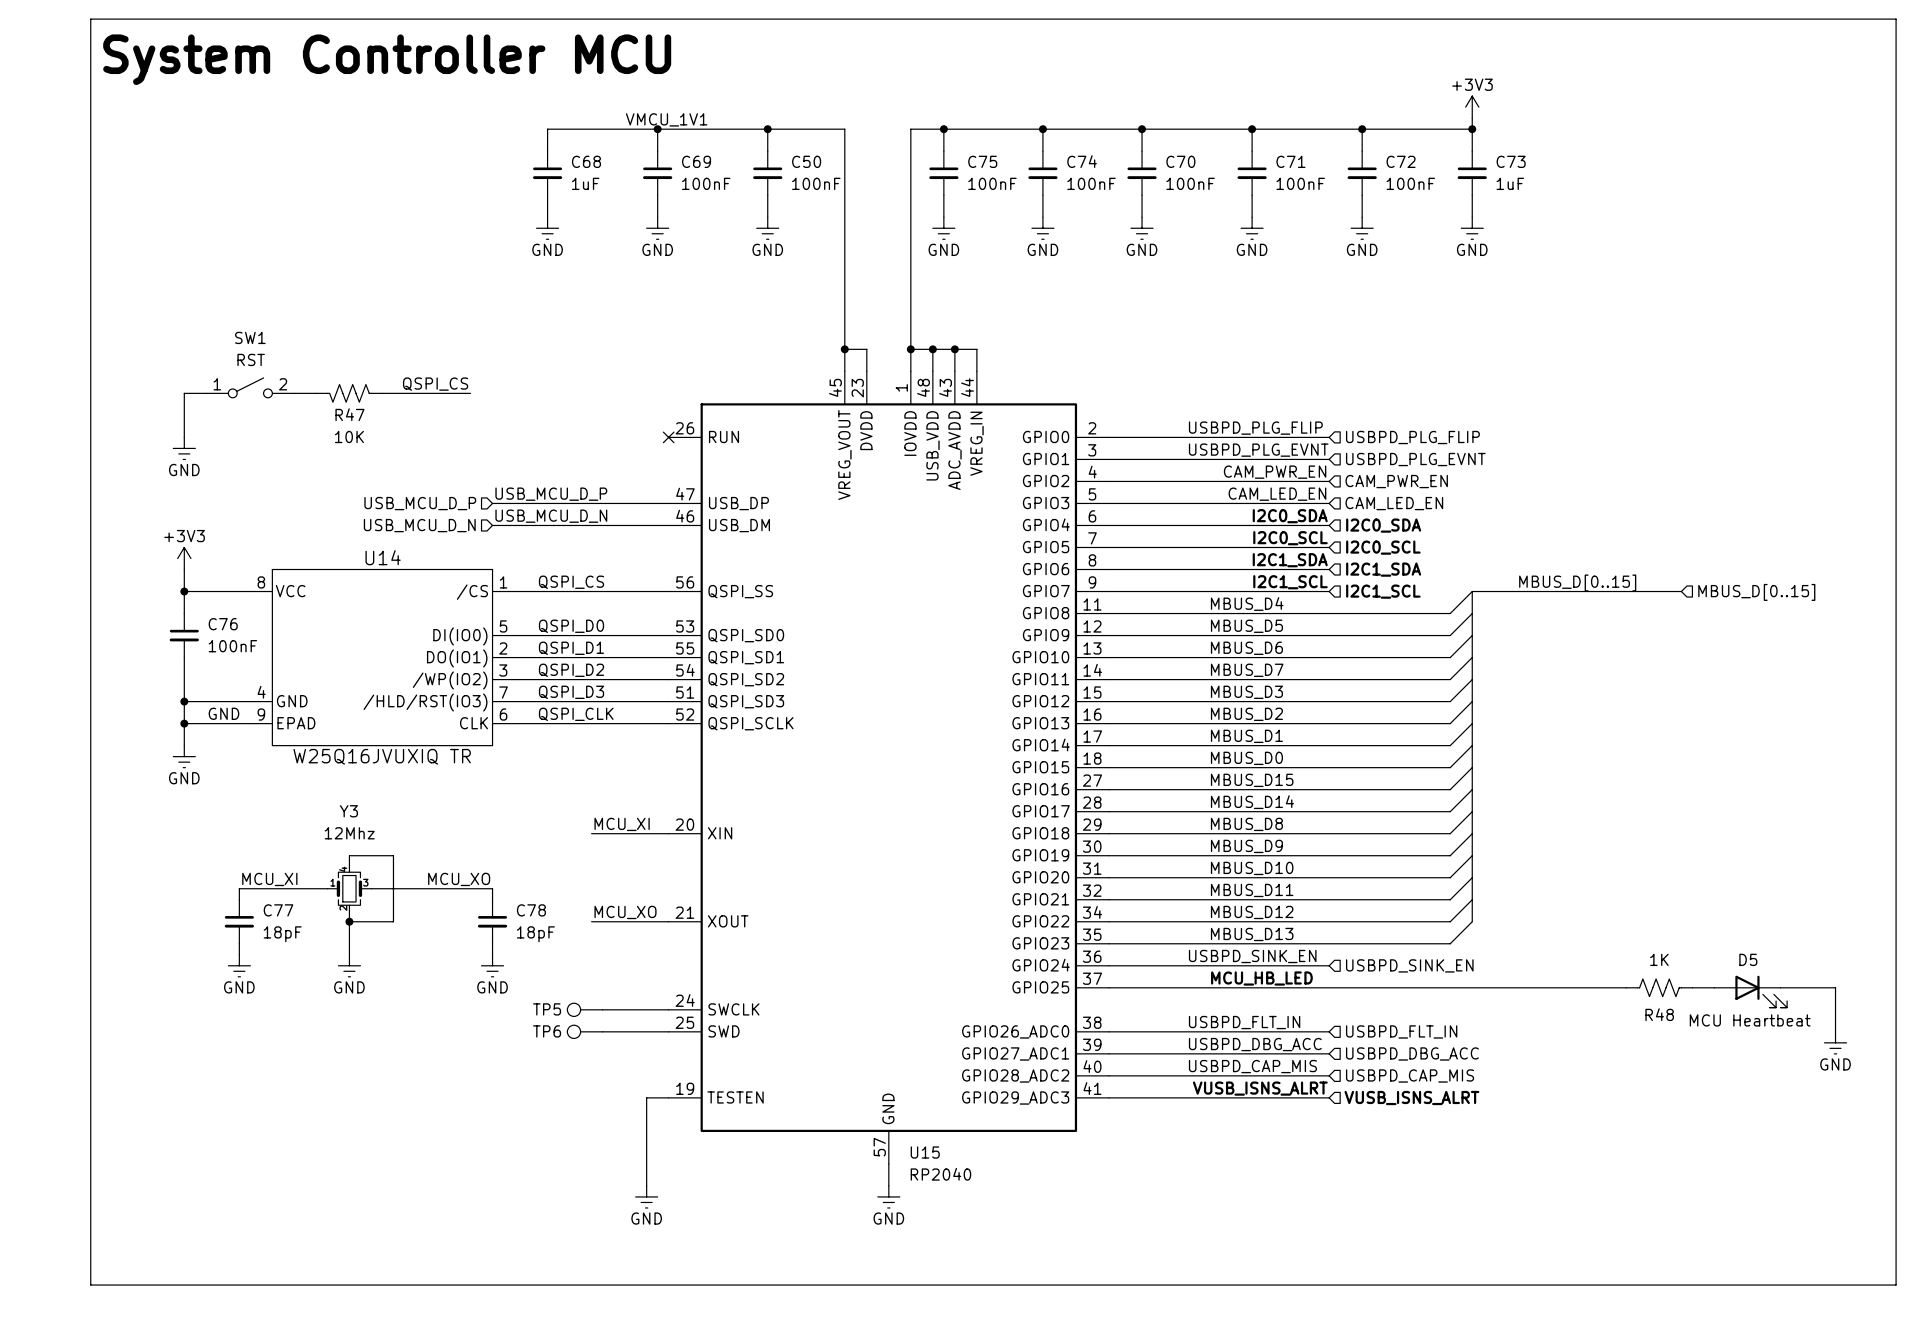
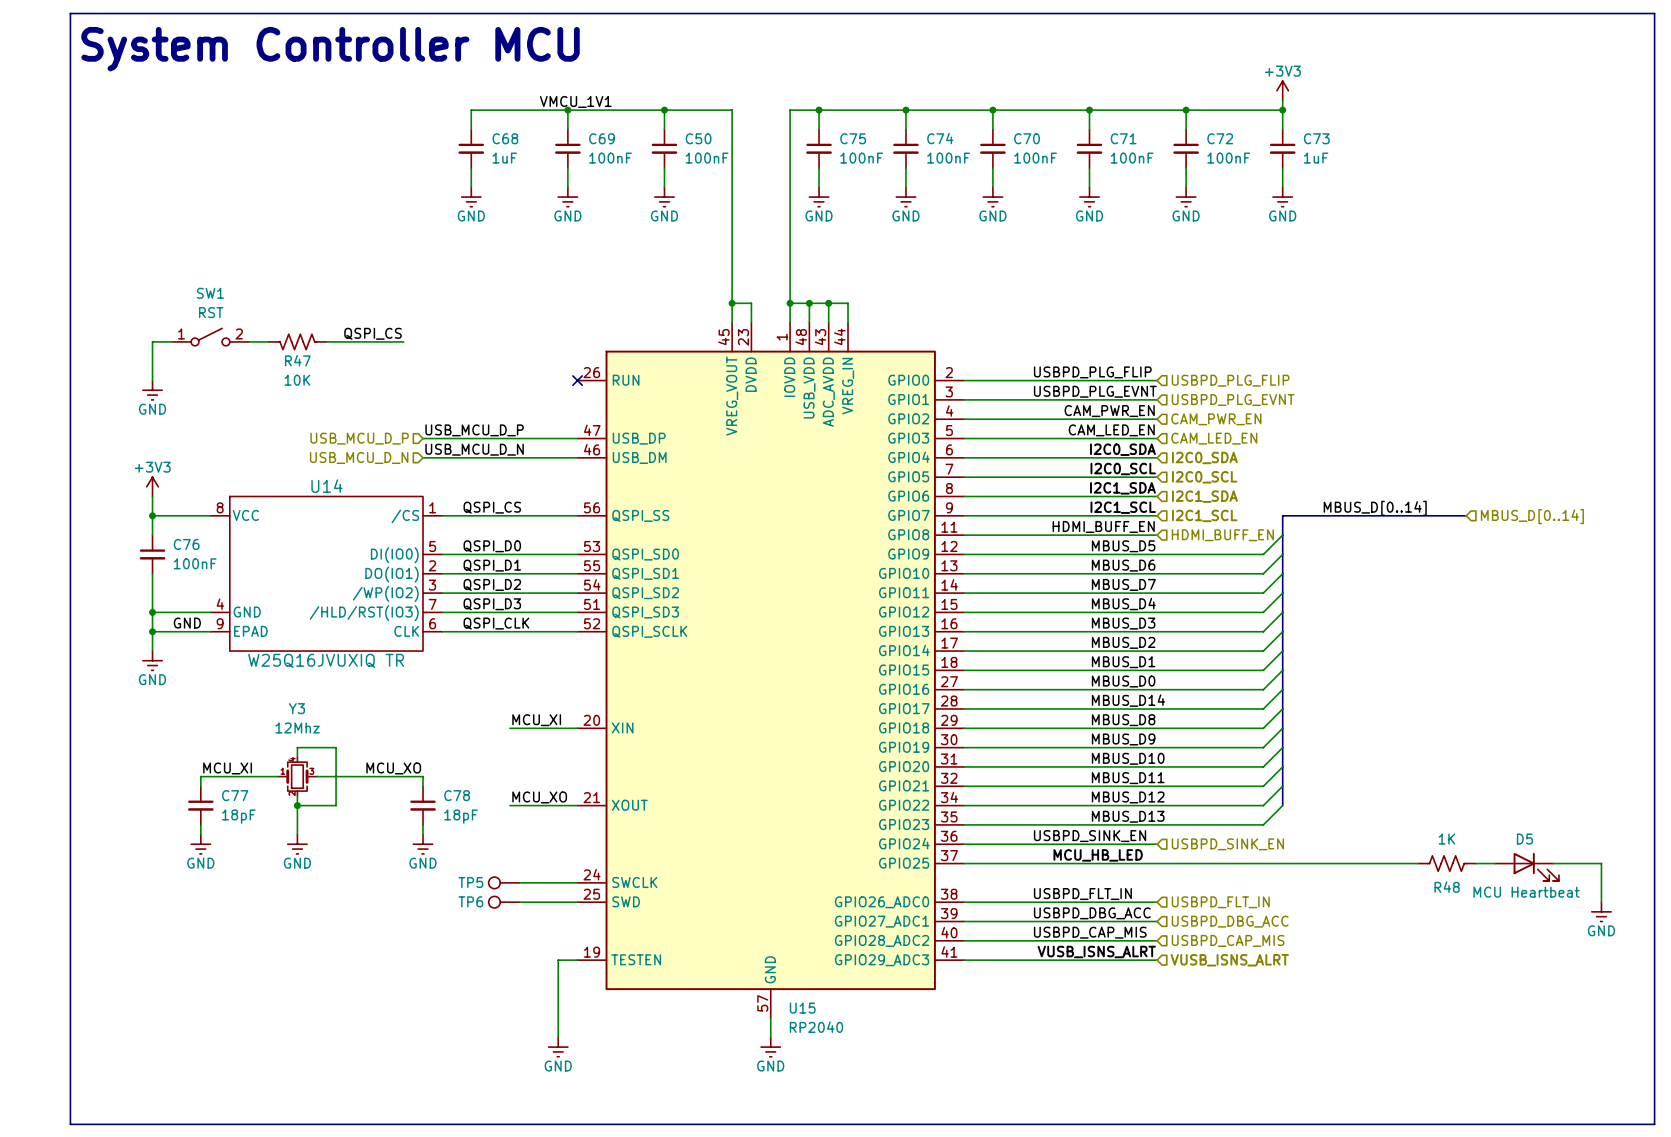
label: MBUS_D[0..15] (1577, 583) -> MBUS_D[0..14] (1375, 508)
wire: (1472, 591) (1450, 613) (1329, 613) -> none
hierarchical label: MBUS_D[0..15] (1756, 592) -> MBUS_D[0..14] (1532, 516)
label position: MBUS_D4 (1247, 603) -> MBUS_D4 (1123, 604)
label: none -> HDMI_BUFF_EN (1103, 526)
hierarchical label: none -> HDMI_BUFF_EN (1222, 535)
label position: MBUS_D5 (1246, 626) -> MBUS_D5 (1123, 546)
label position: MBUS_D6 (1246, 648) -> MBUS_D6 (1123, 565)
label position: MBUS_D7 (1247, 670) -> MBUS_D7 (1123, 584)
label position: MBUS_D3 (1246, 692) -> MBUS_D3 (1123, 623)
label position: MBUS_D2 (1246, 714) -> MBUS_D2 (1123, 642)
label position: MBUS_D1 (1246, 736) -> MBUS_D1 (1123, 662)
label position: MBUS_D0 (1246, 758) -> MBUS_D0 (1123, 681)
label: MBUS_D15 (1252, 780) -> none
label position: MBUS_D14 (1252, 802) -> MBUS_D14 (1128, 700)
label position: MBUS_D8 (1246, 824) -> MBUS_D8 (1123, 720)
label position: MBUS_D9 (1246, 846) -> MBUS_D9 (1123, 739)
label position: MBUS_D10 (1252, 868) -> MBUS_D10 (1128, 758)
label position: MBUS_D11 (1252, 890) -> MBUS_D11 (1128, 778)
label position: MBUS_D12 (1252, 912) -> MBUS_D12 (1128, 797)
label position: MBUS_D13 (1252, 934) -> MBUS_D13 (1128, 816)

